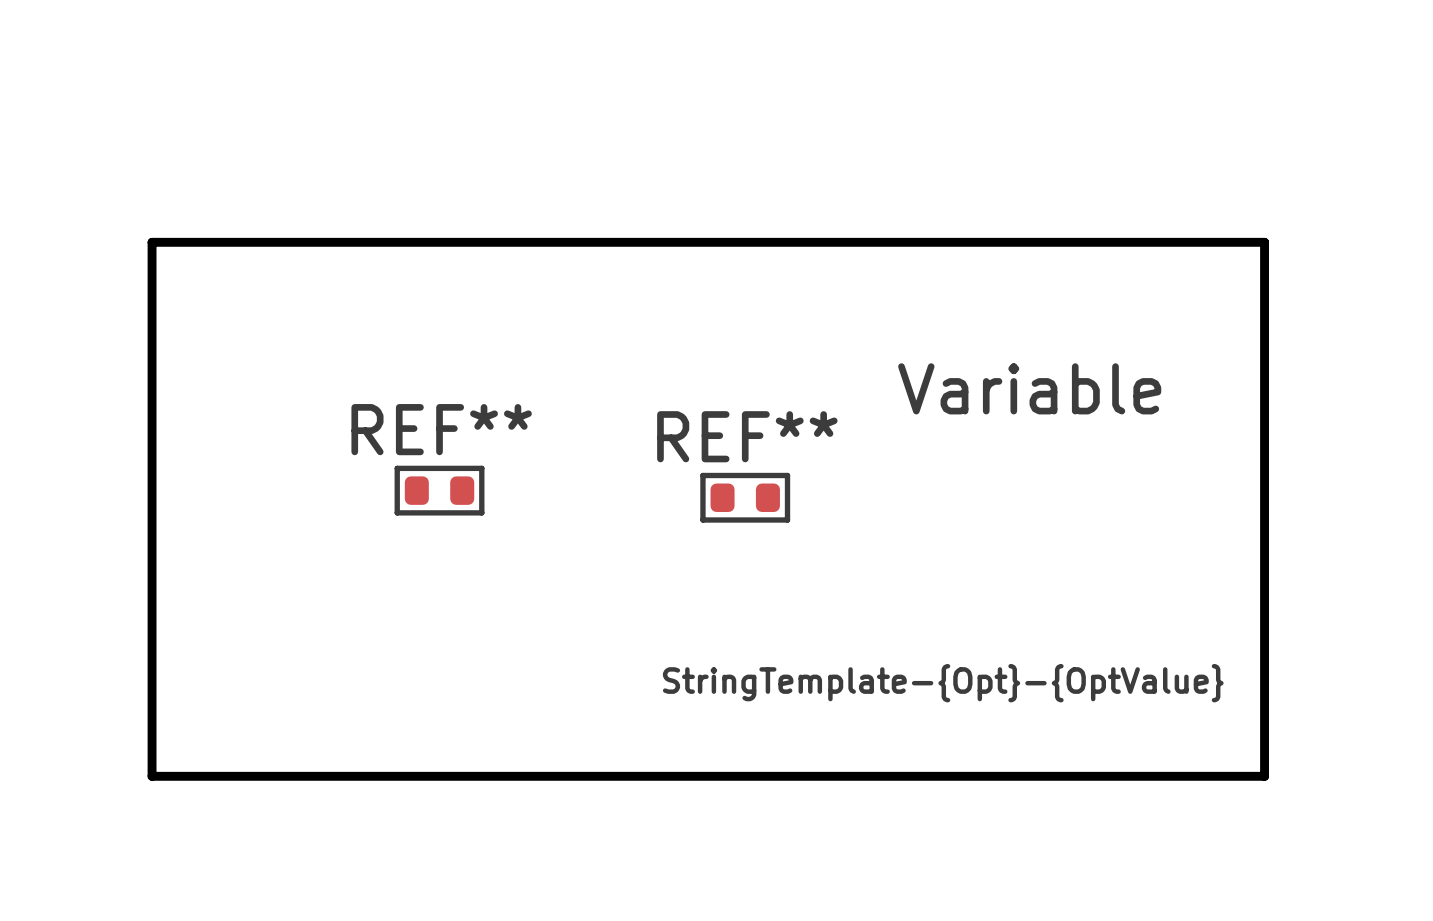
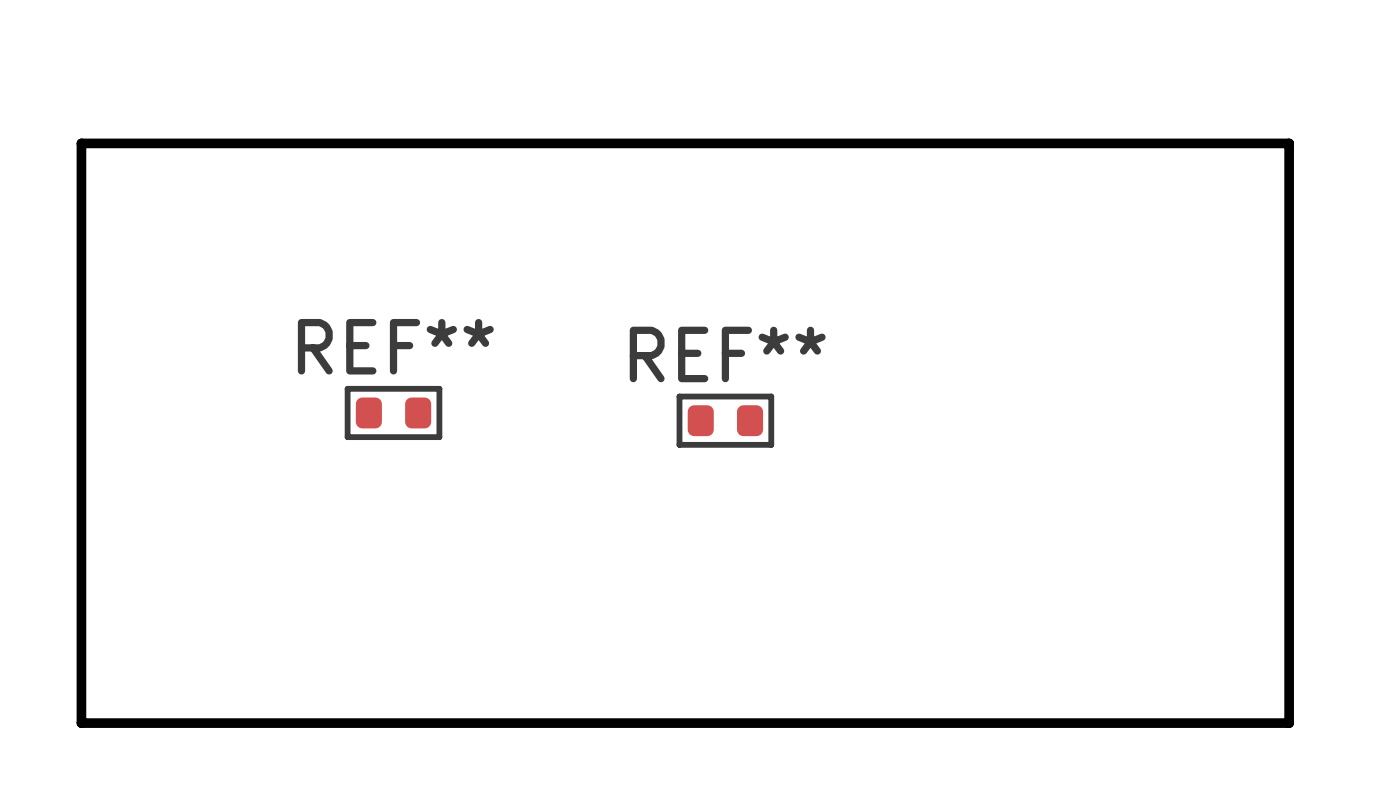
drawing: [898, 363, 1162, 415] -> none
drawing: [662, 664, 1224, 703] -> none

